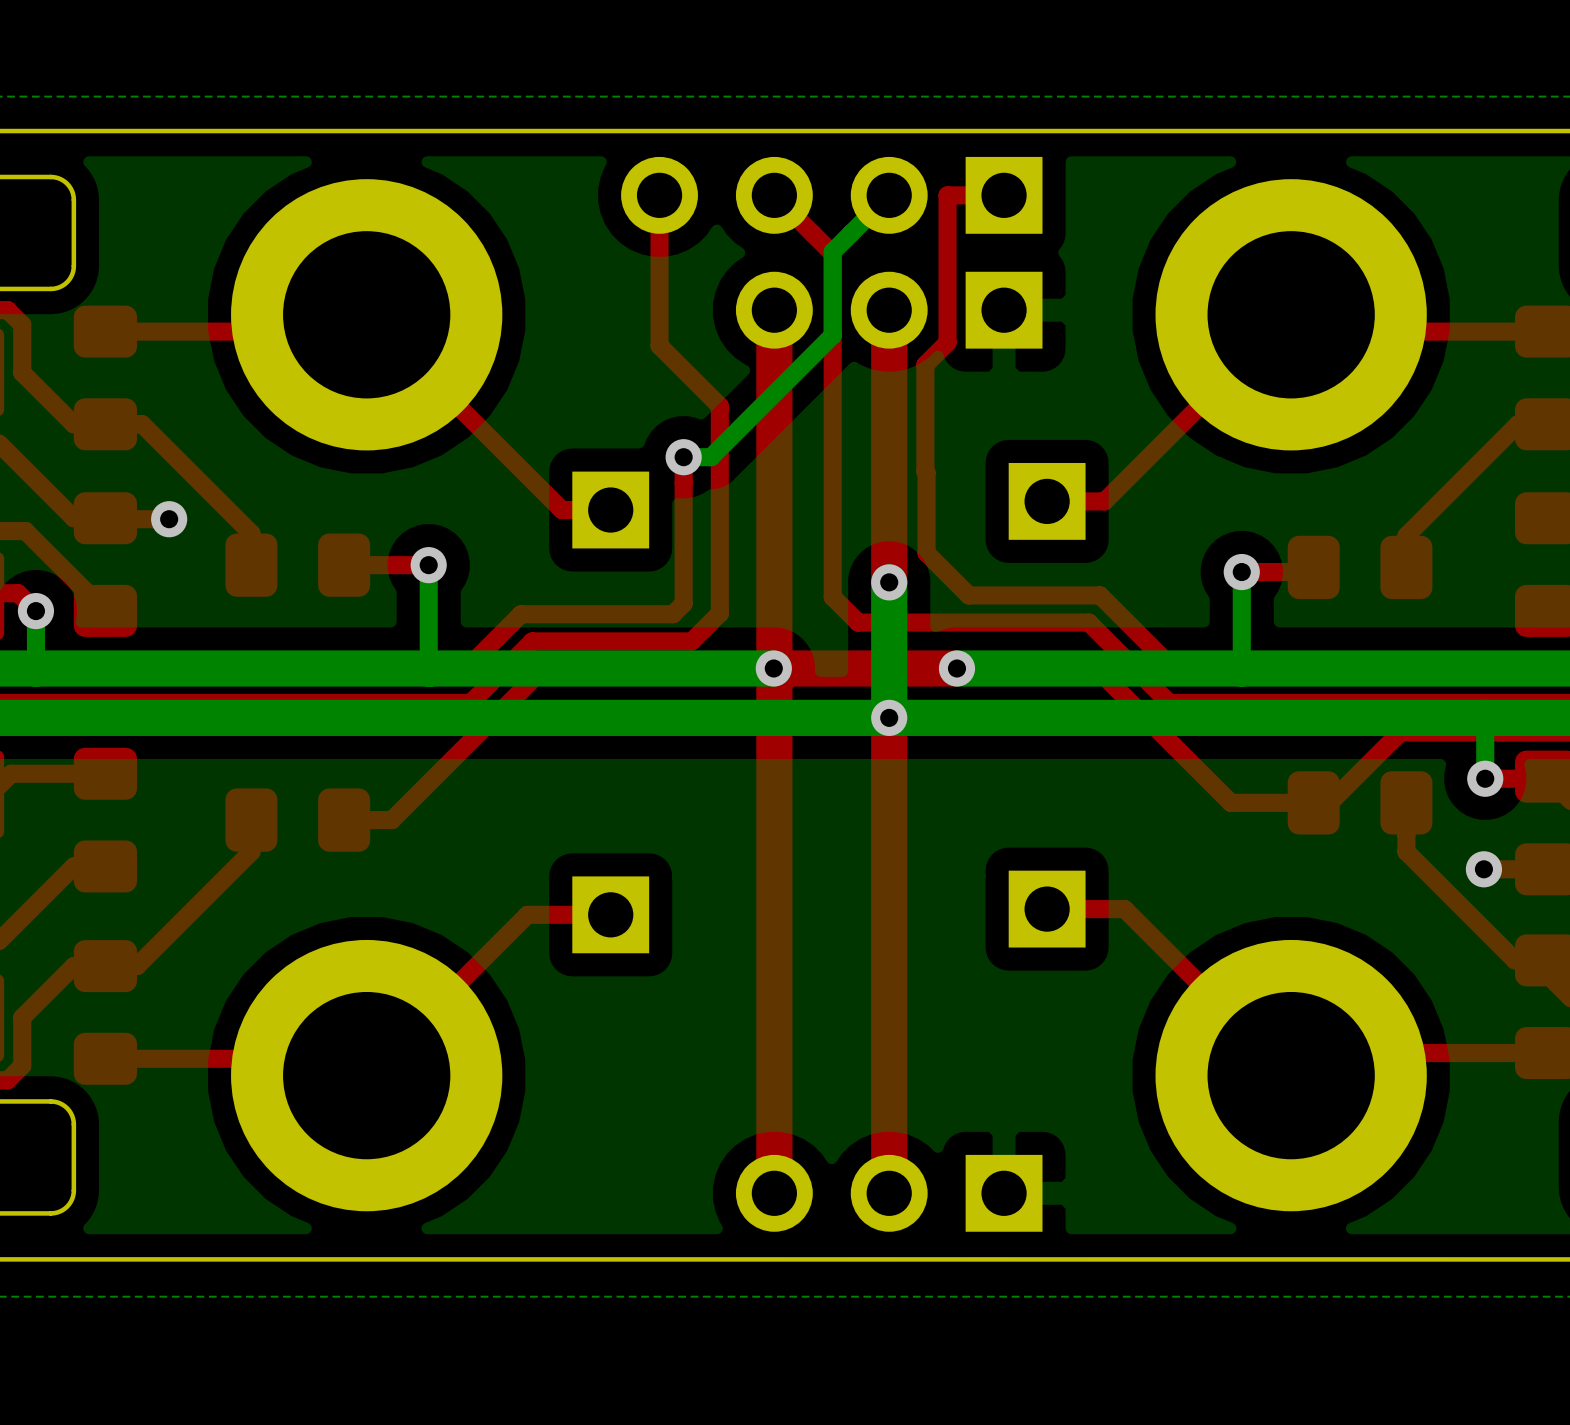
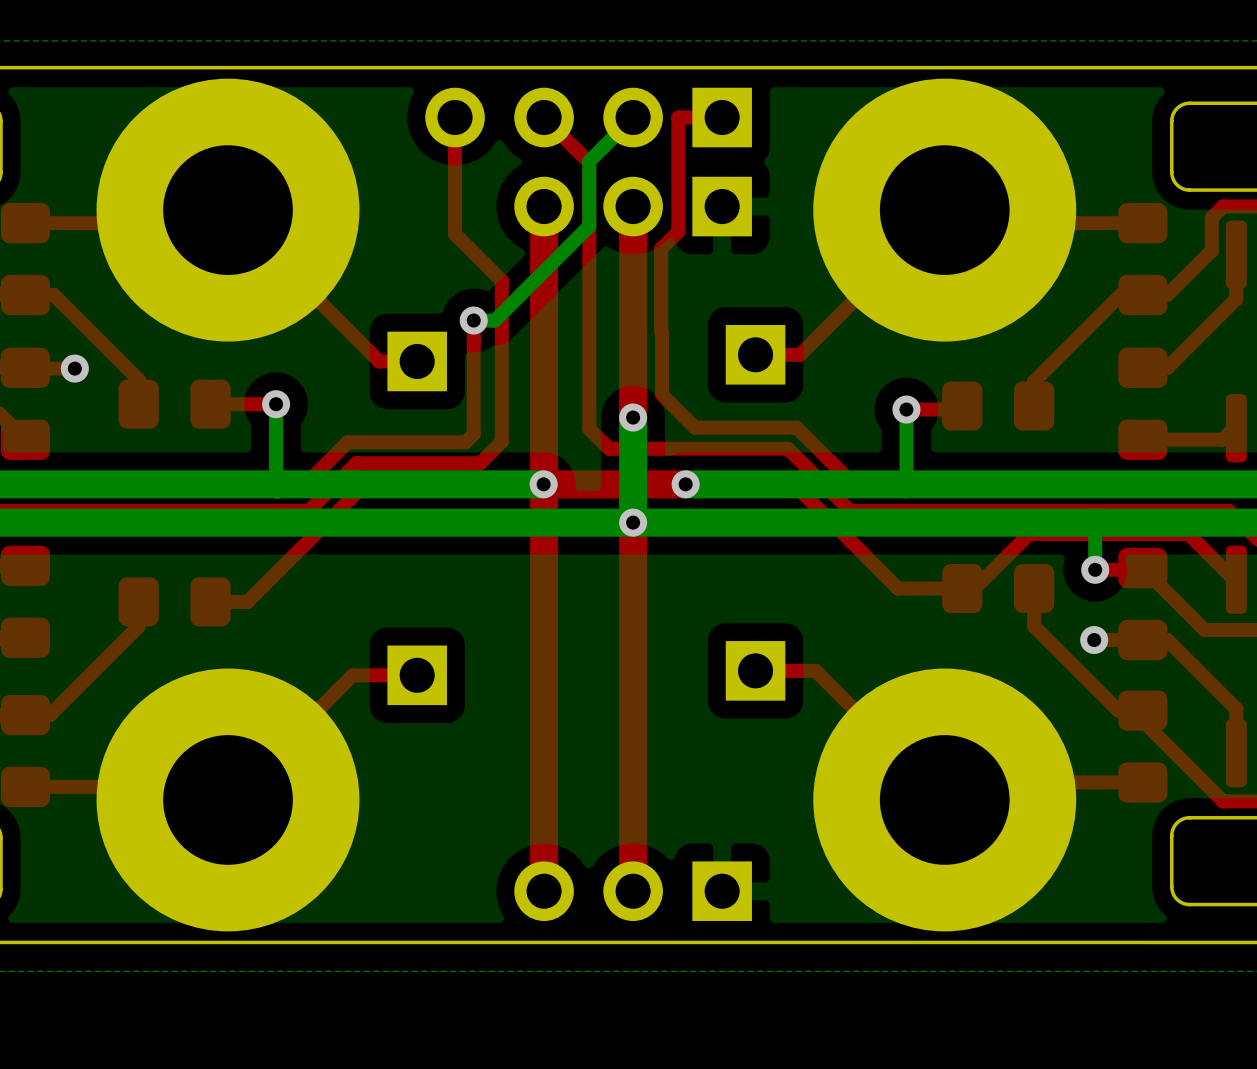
part footprint: [231, 179, 503, 451] -> [96, 78, 360, 342]
part footprint: [1155, 179, 1427, 451] -> [813, 78, 1077, 342]
part footprint: [231, 939, 503, 1212] -> [96, 668, 360, 932]
part footprint: [1155, 939, 1427, 1212] -> [813, 668, 1077, 932]

